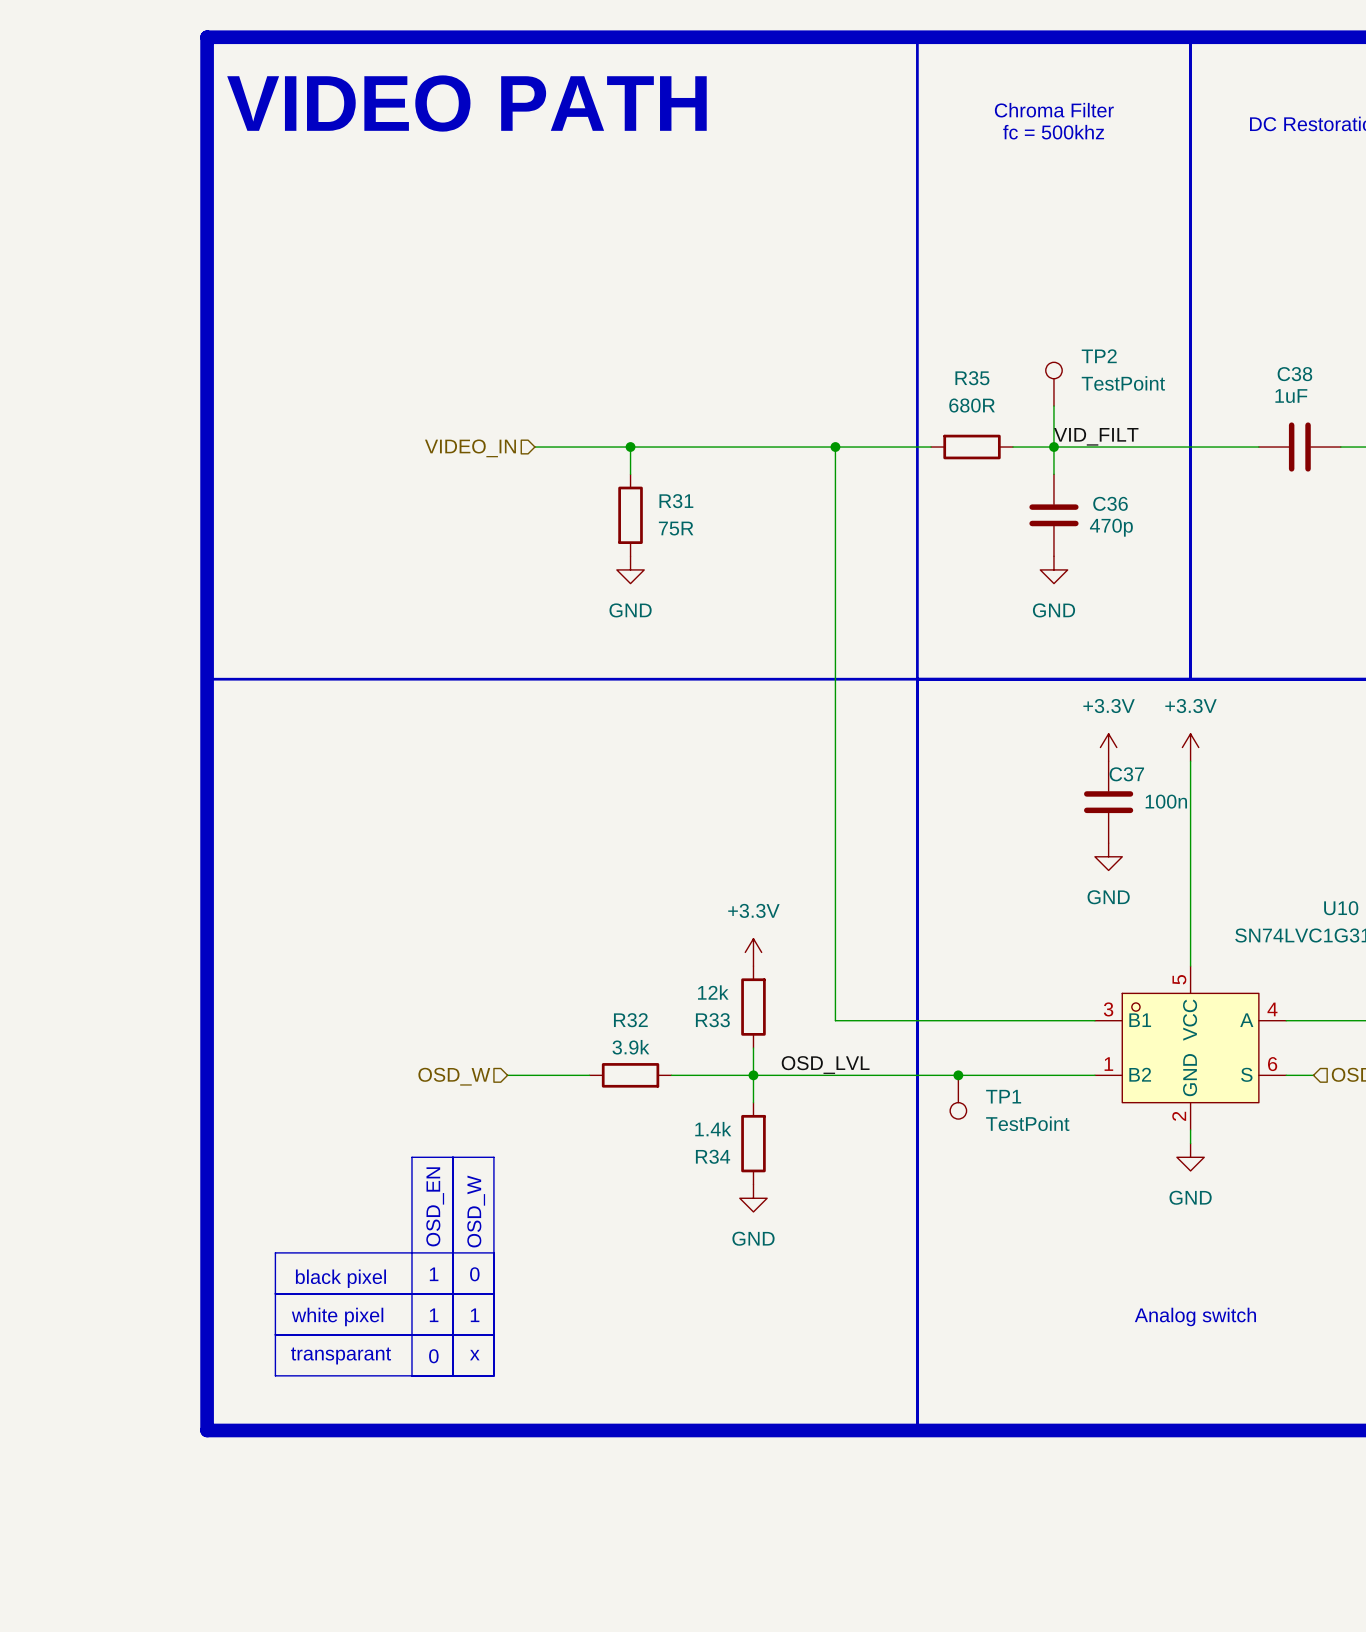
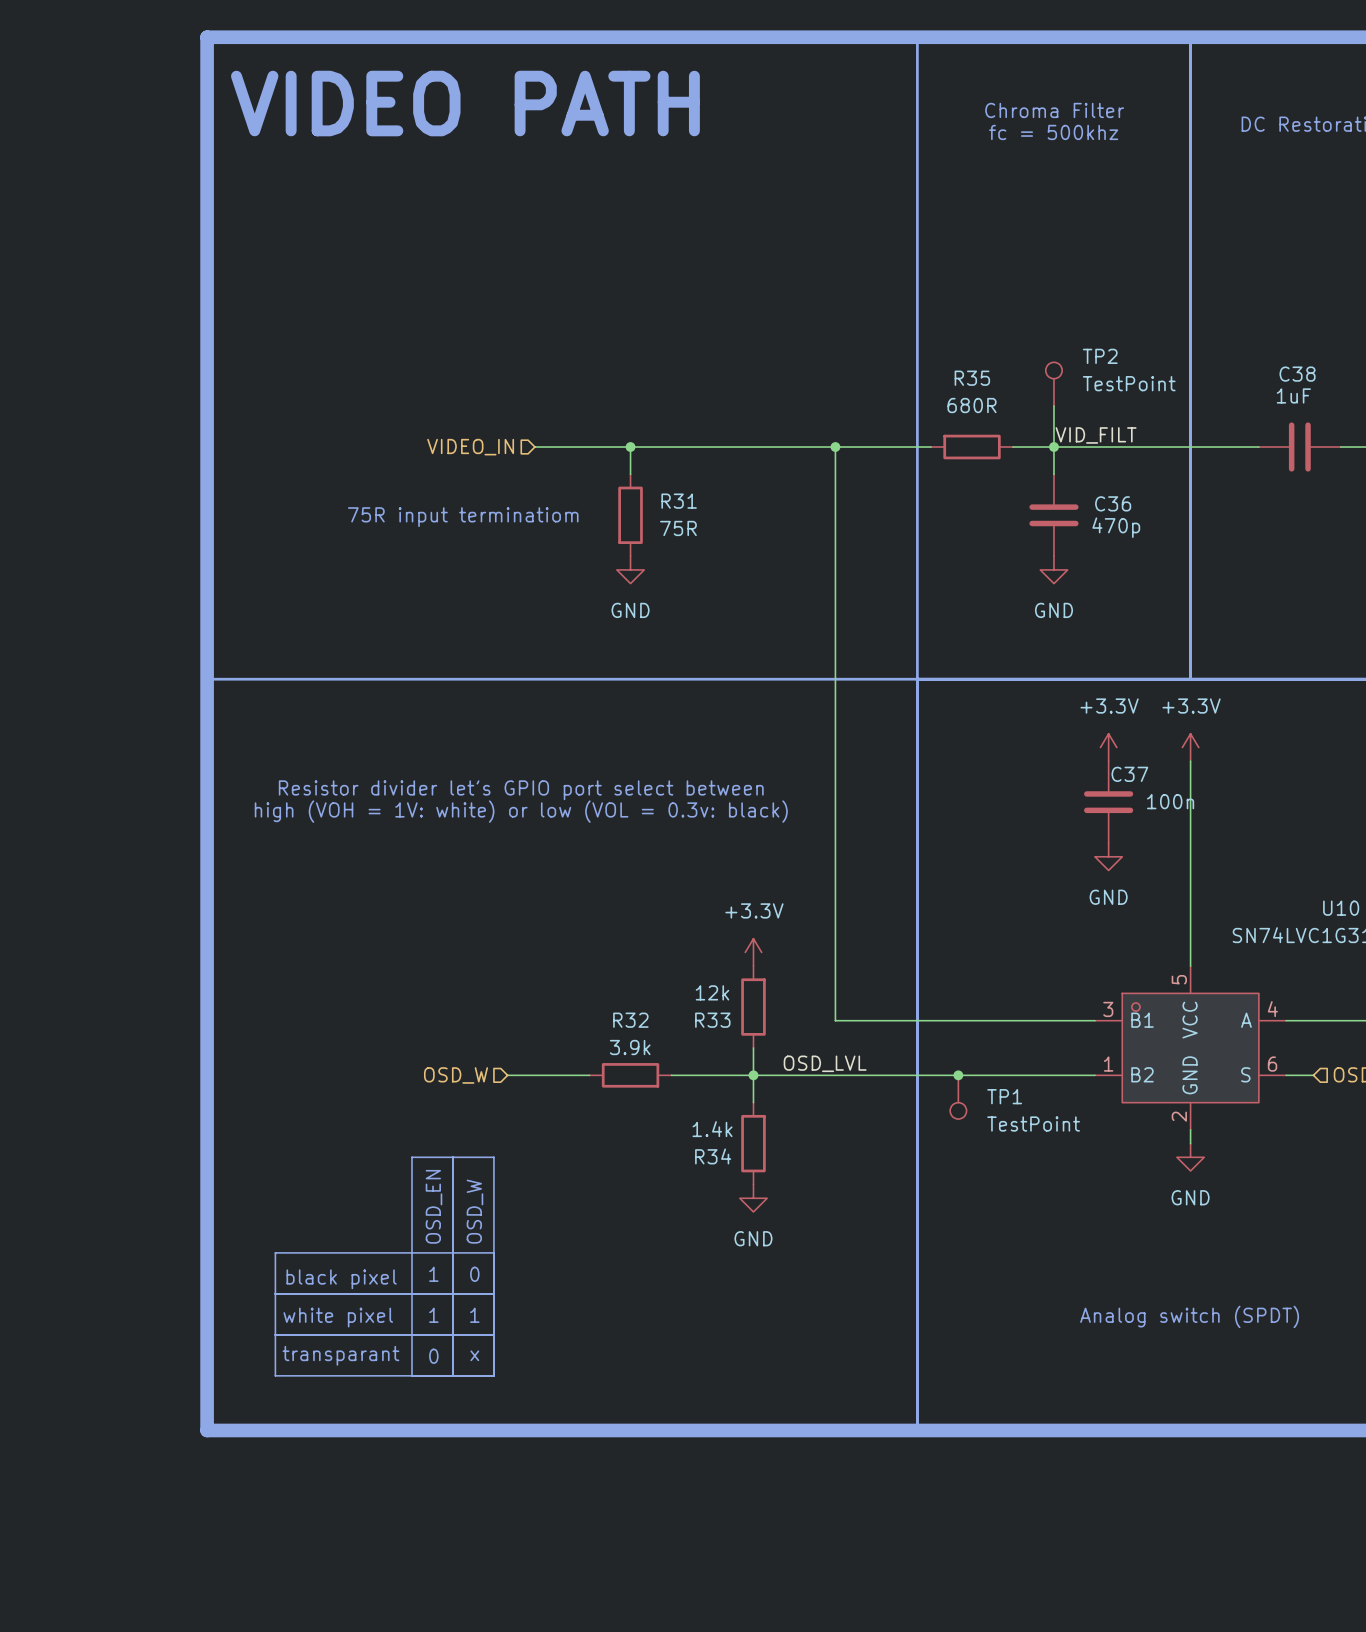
text: none -> 75R input terminatiom (463, 517)
text: none -> Resistor divider let's GPIO port select between (521, 790)
text: none -> high (VOH = 1V: white) or low (VOL = 0.3v: black) (521, 811)
text: Analog switch (1195, 1316) -> Analog switch (SPDT) (1189, 1316)

